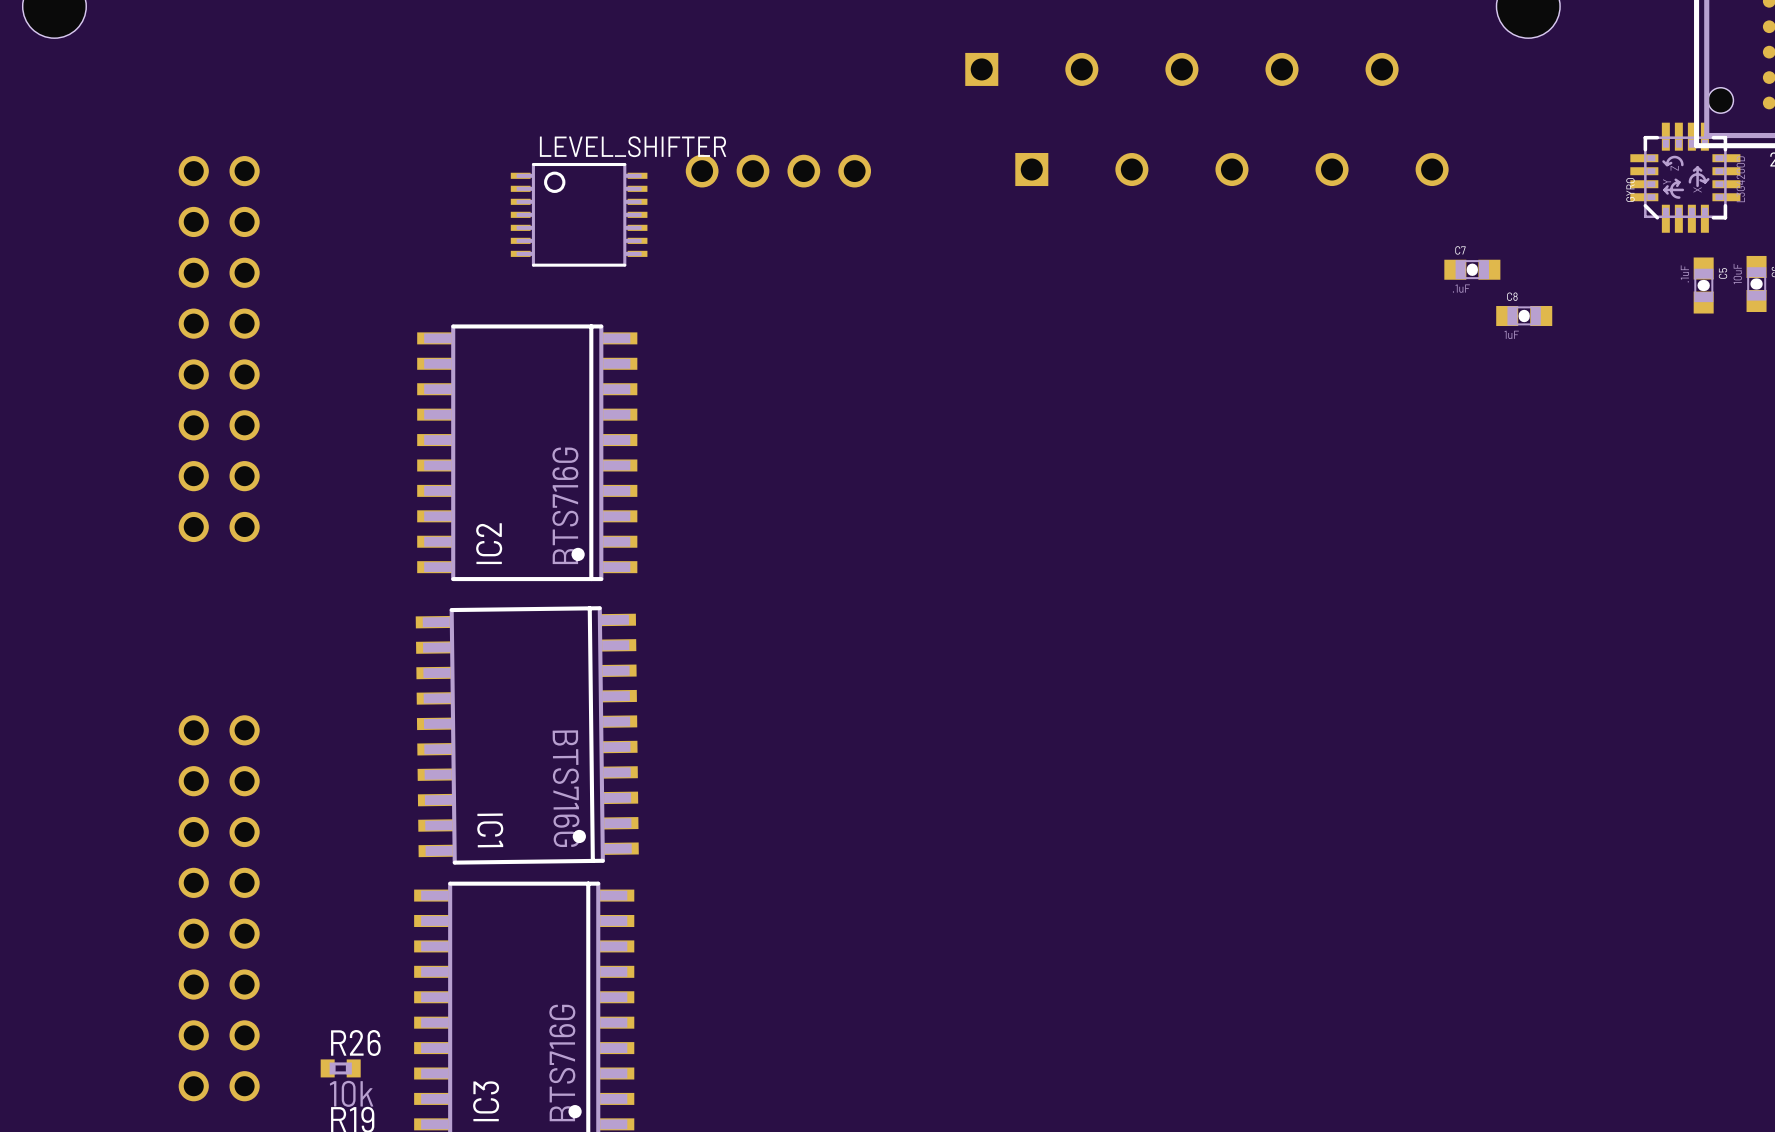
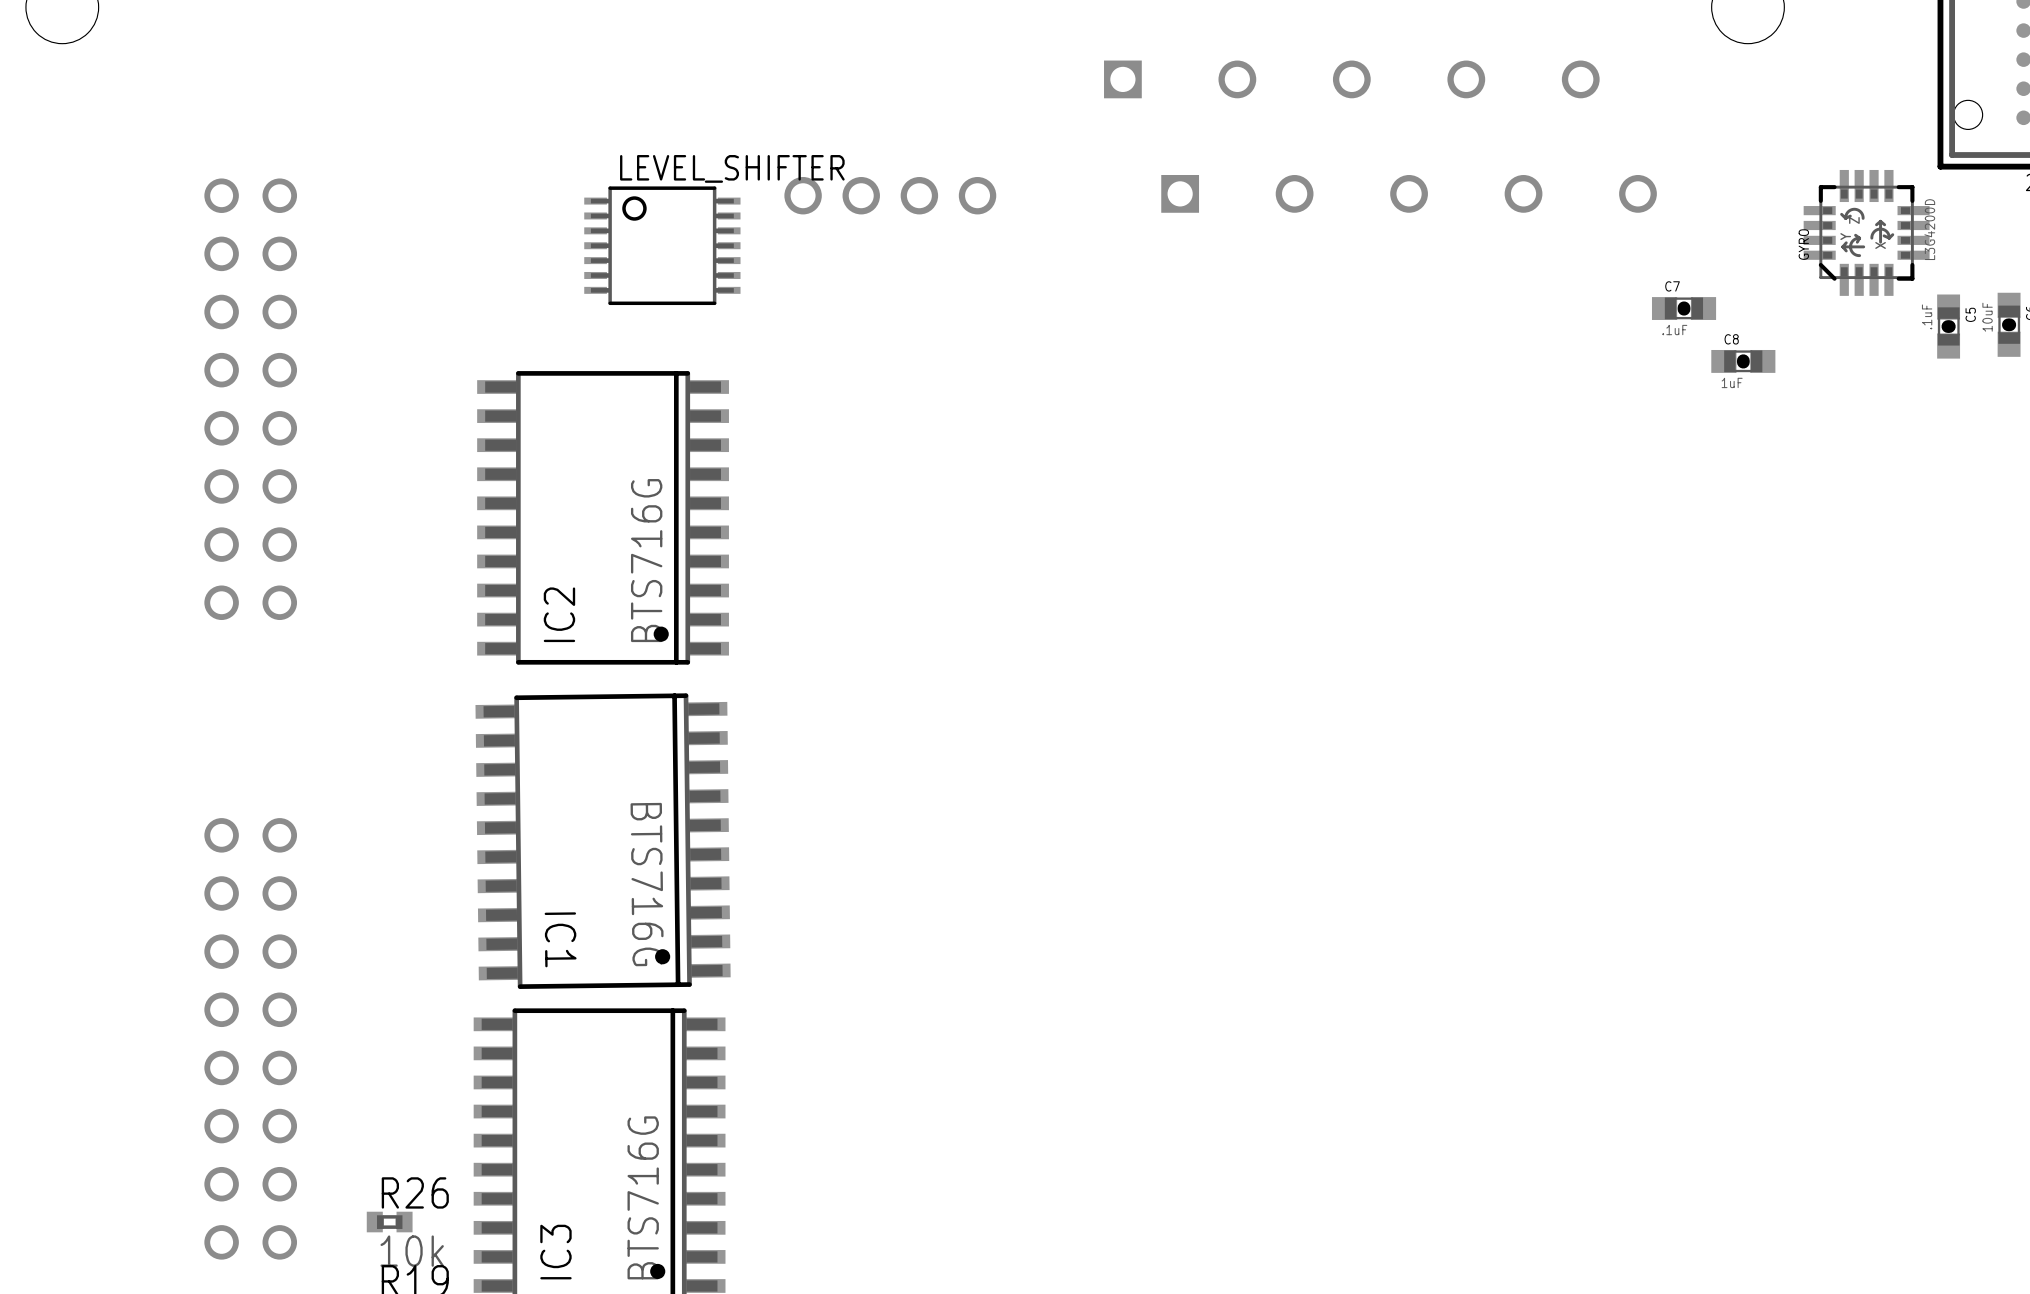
GYRO position: (1685, 177) -> (1866, 232)

